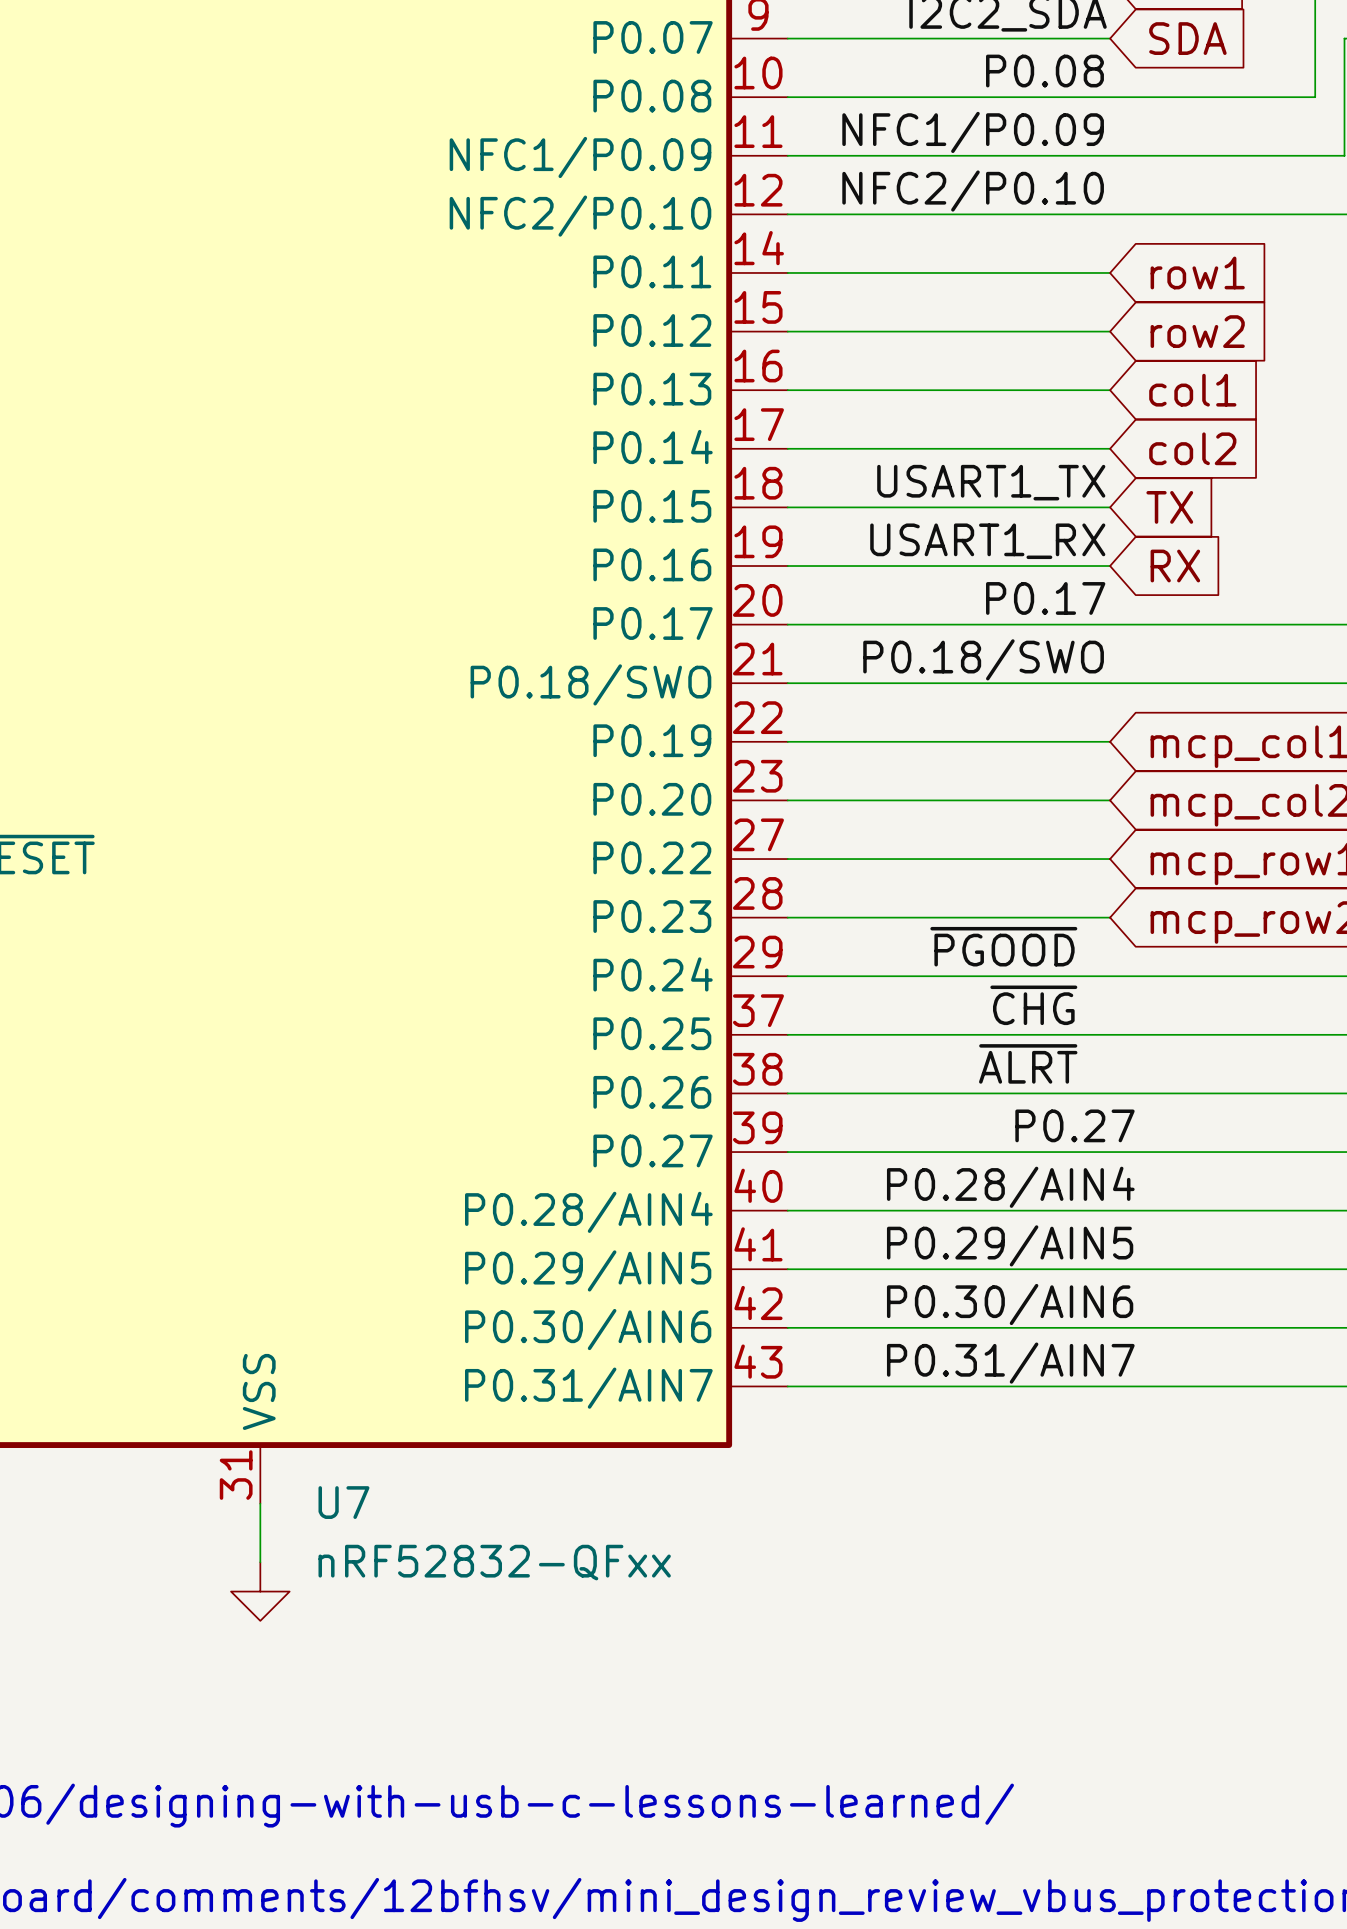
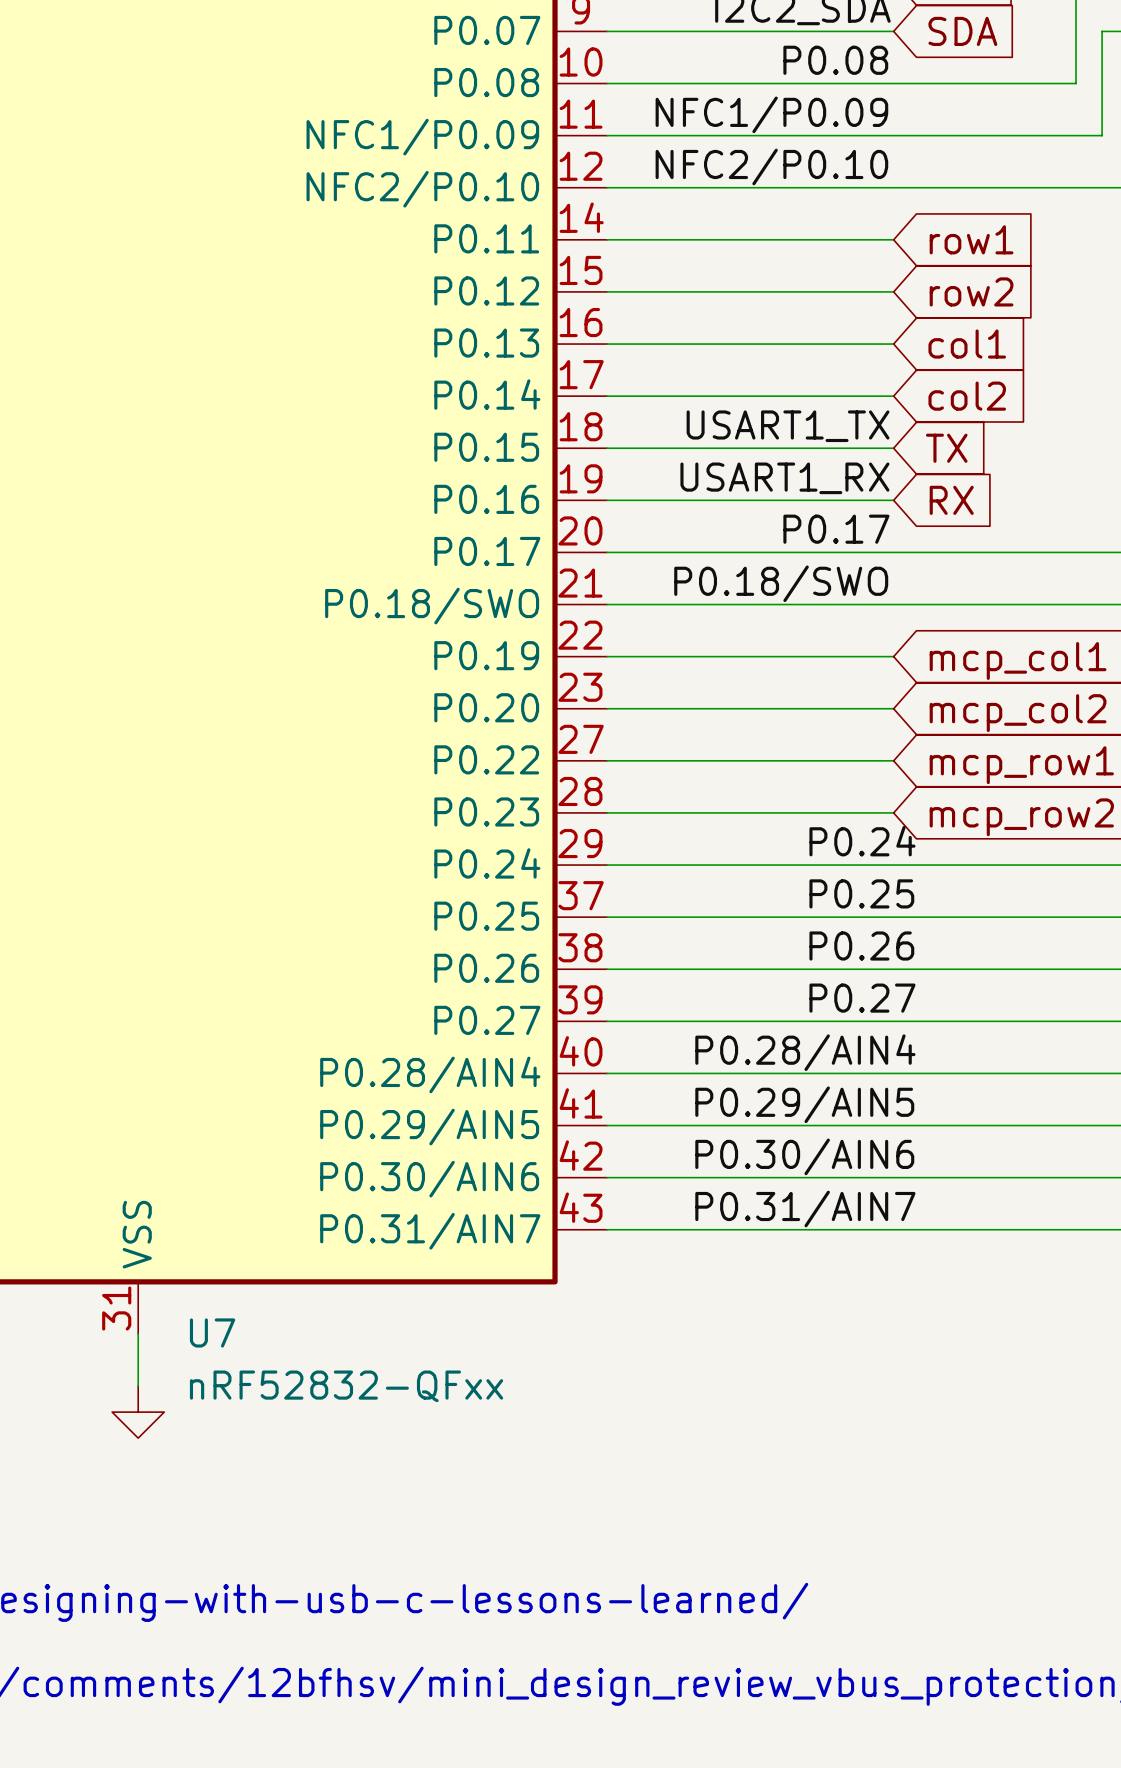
label: ~{PGOOD} (1003, 946) -> none
label: none -> P0.24 (862, 841)
label: ~{CHG} (1033, 1005) -> none
label: none -> P0.25 (861, 893)
label: ~{ALRT} (1028, 1063) -> none
label: none -> P0.26 (861, 946)

